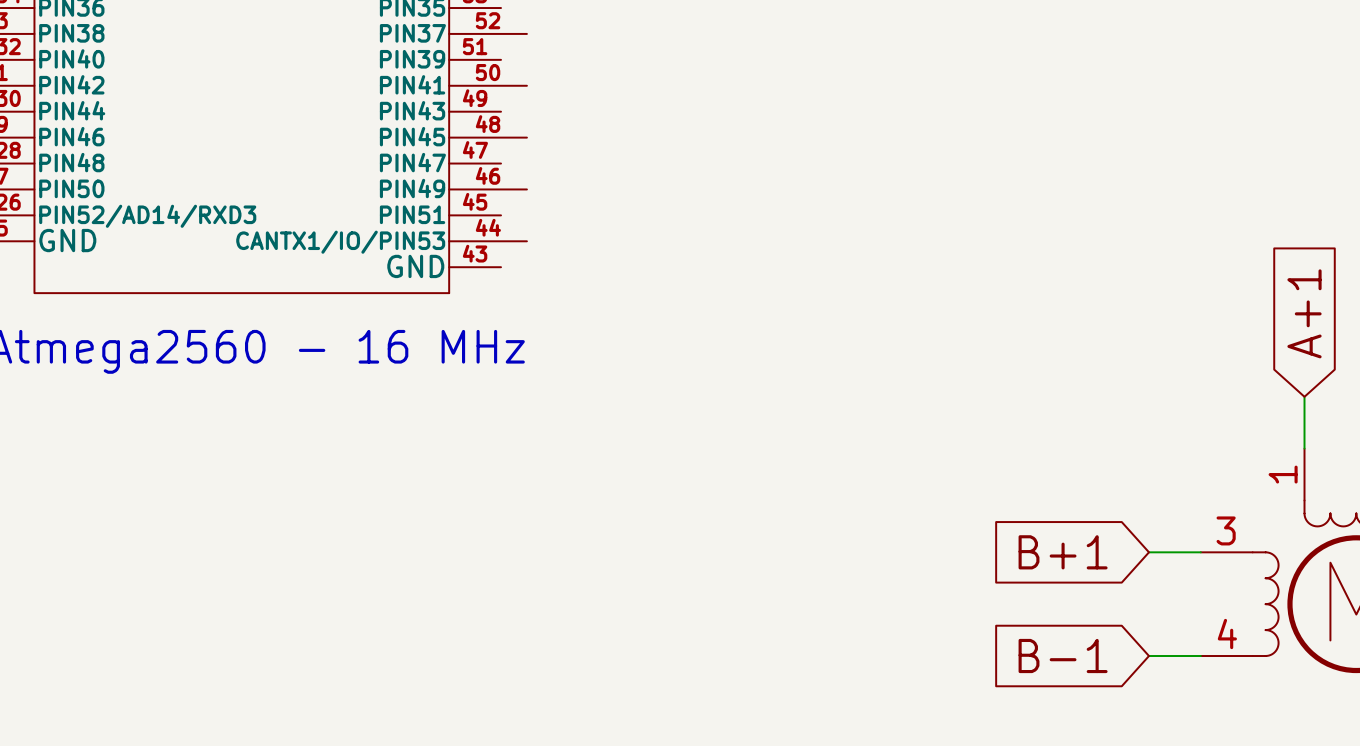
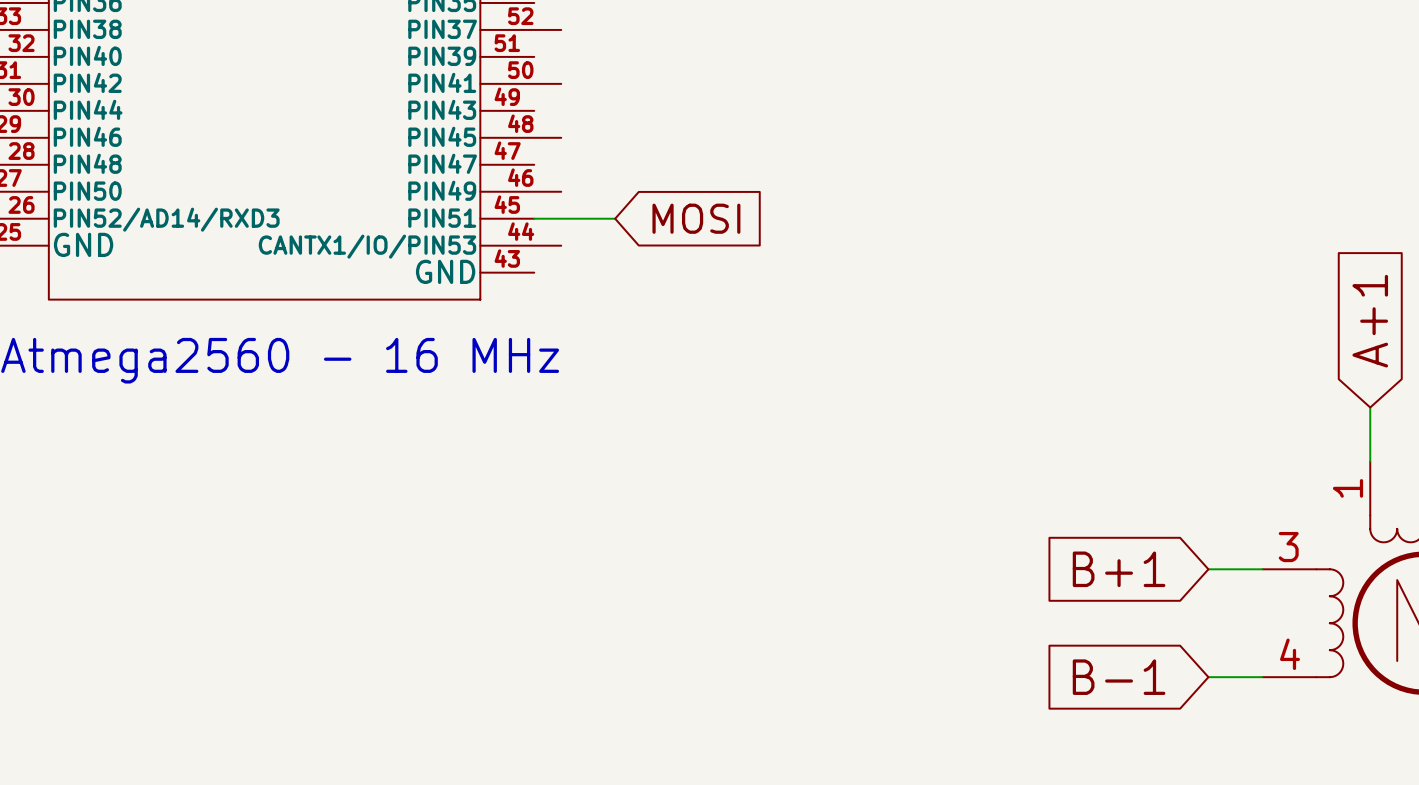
wire: none -> (534, 218) (615, 218)
global label: none -> MOSI (696, 218)

